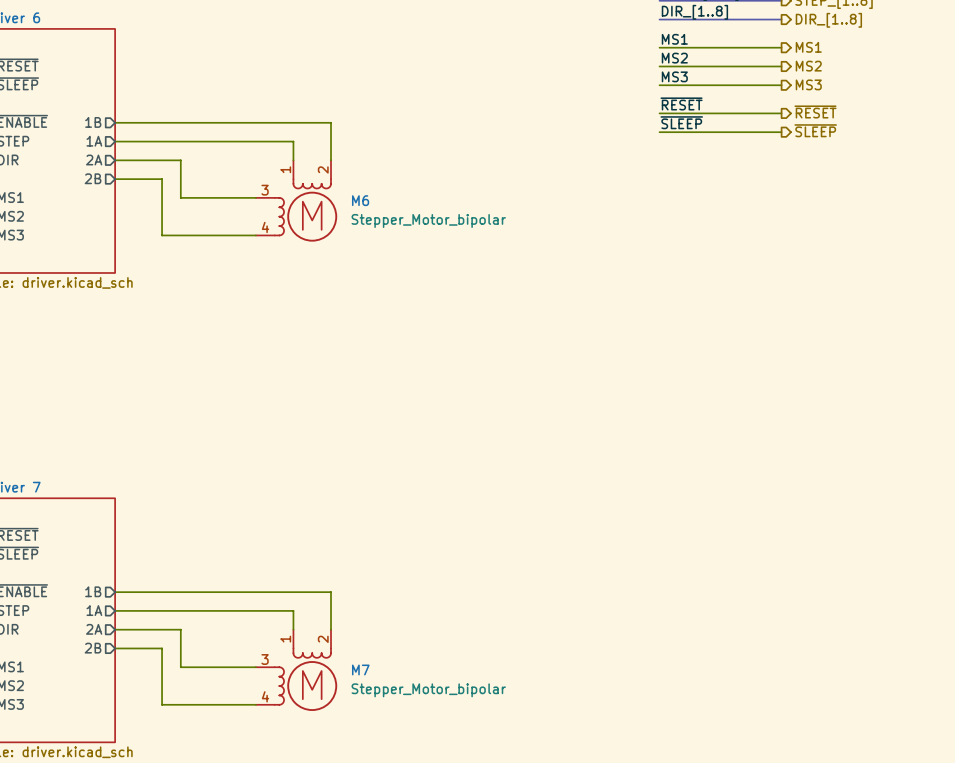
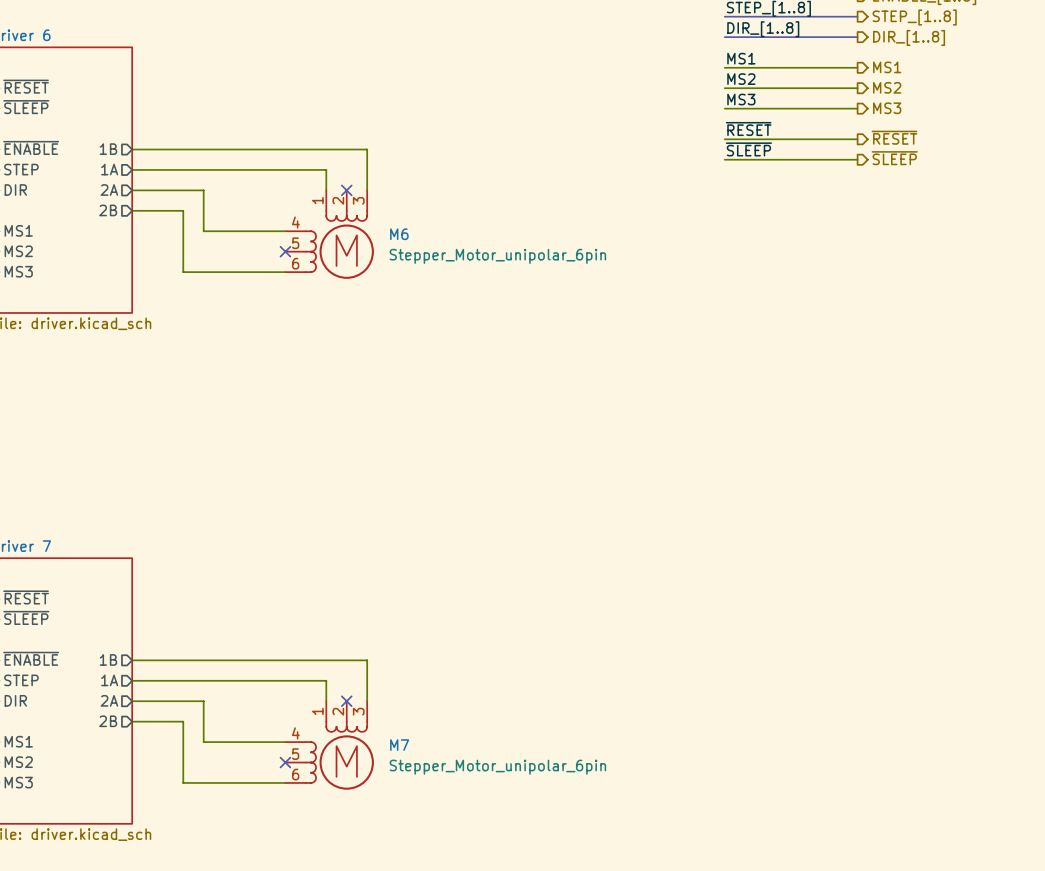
M6 symbol: [255, 160, 338, 242] -> [285, 190, 374, 279]
no-connect mark: none -> (346, 190)
no-connect mark: none -> (285, 251)
M6 value: Stepper_Motor_bipolar (428, 220) -> Stepper_Motor_unipolar_6pin (497, 256)
M7 symbol: [255, 629, 338, 711] -> [285, 701, 374, 790]
no-connect mark: none -> (346, 701)
no-connect mark: none -> (285, 762)
M7 value: Stepper_Motor_bipolar (428, 690) -> Stepper_Motor_unipolar_6pin (497, 767)

